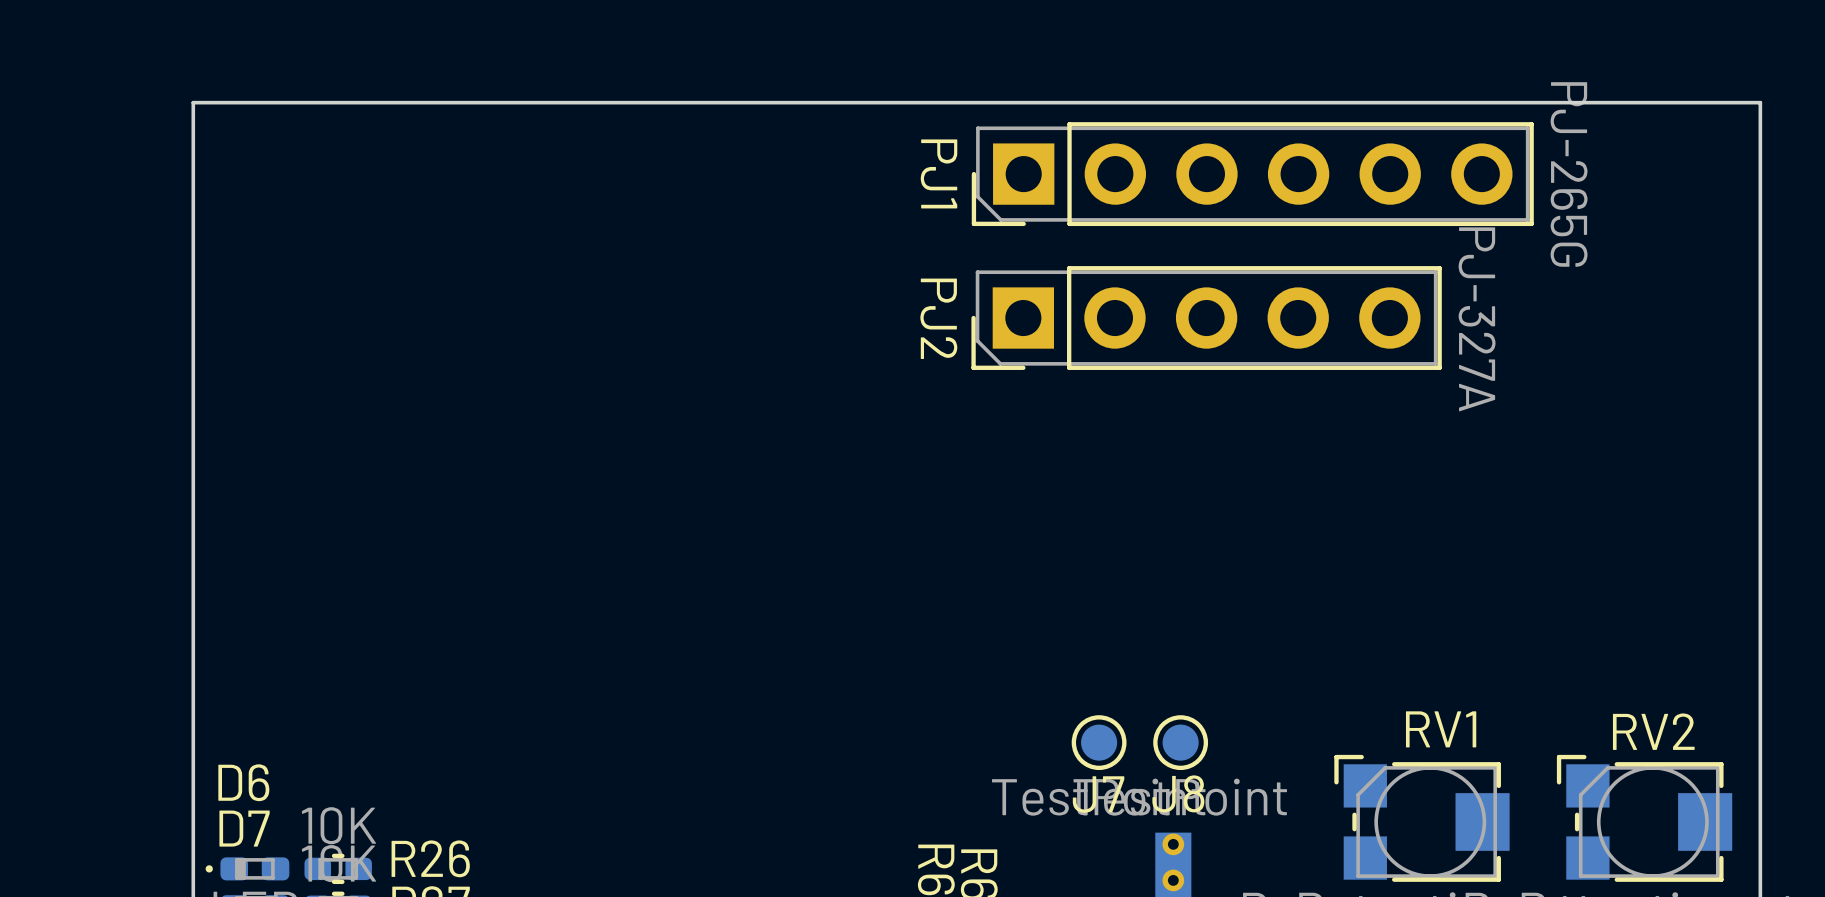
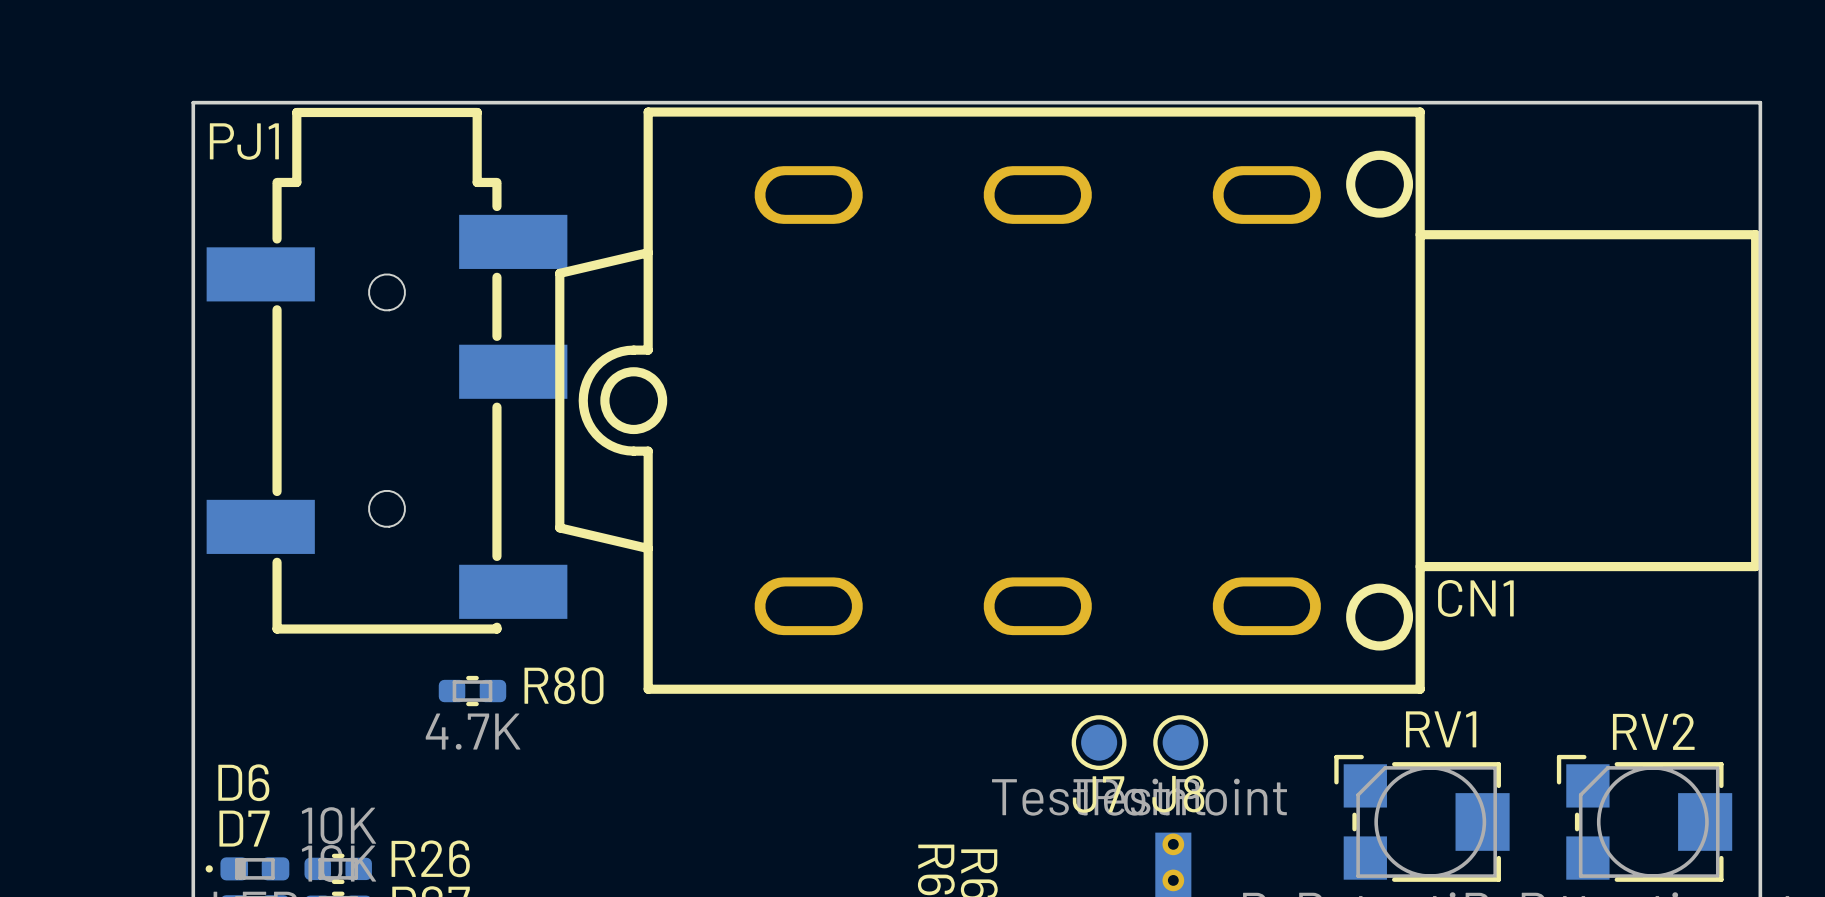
PJ1 footprint: [971, 122, 1534, 227] -> [206, 107, 568, 634]
PJ1 name position: PJ1 (939, 173) -> PJ1 (244, 141)
PJ1 value: PJ-265G (1569, 174) -> none
PJ2: PJ-327A (1206, 318) -> none
CN1: none -> (1157, 400)
R80: none -> 4.7K (472, 691)

